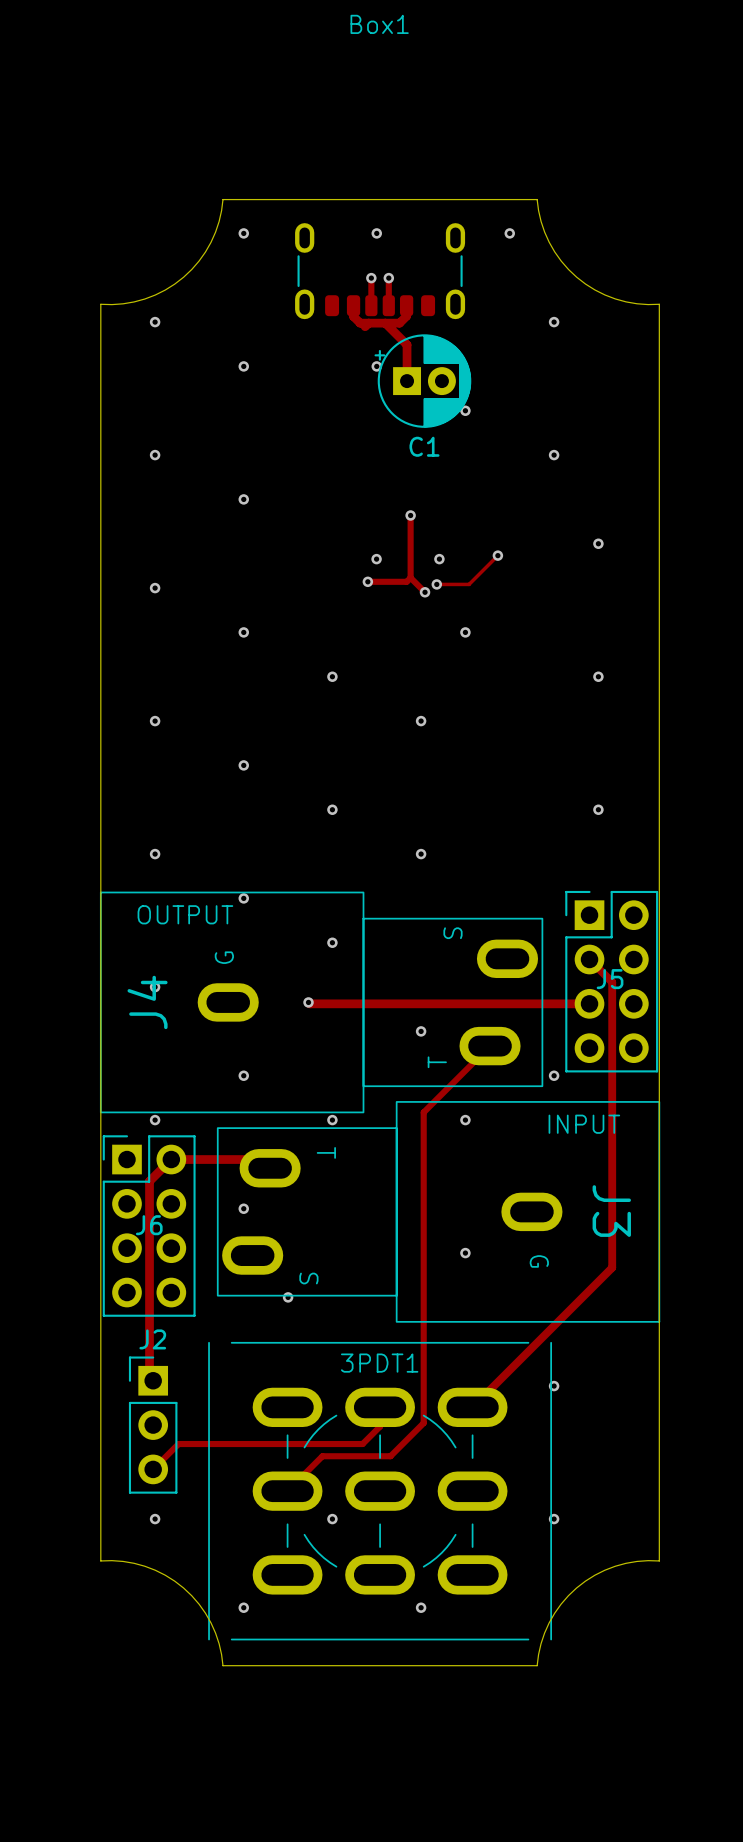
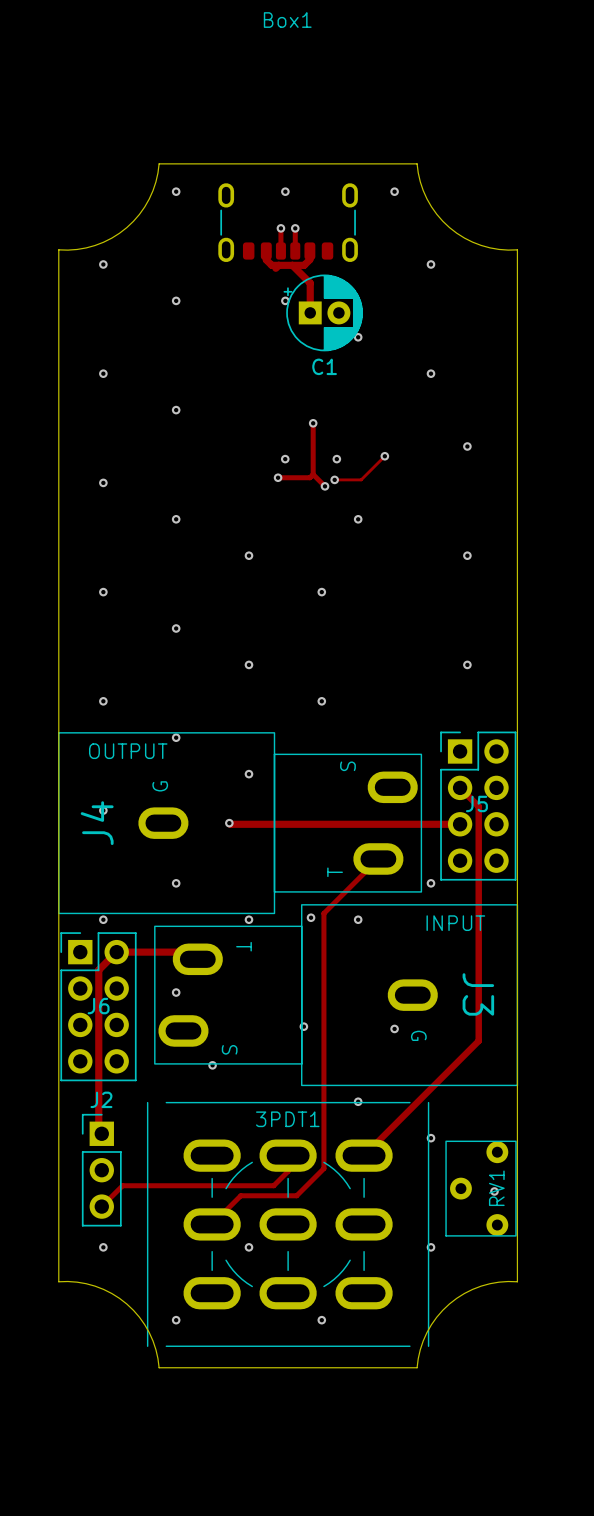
via: (421, 1031) -> none
via: none -> (311, 917)
via: none -> (303, 1026)
via: (465, 1253) -> none
via: none -> (394, 1028)
via: none -> (358, 1101)
RV1: none -> (481, 1188)
via: none -> (494, 1191)

